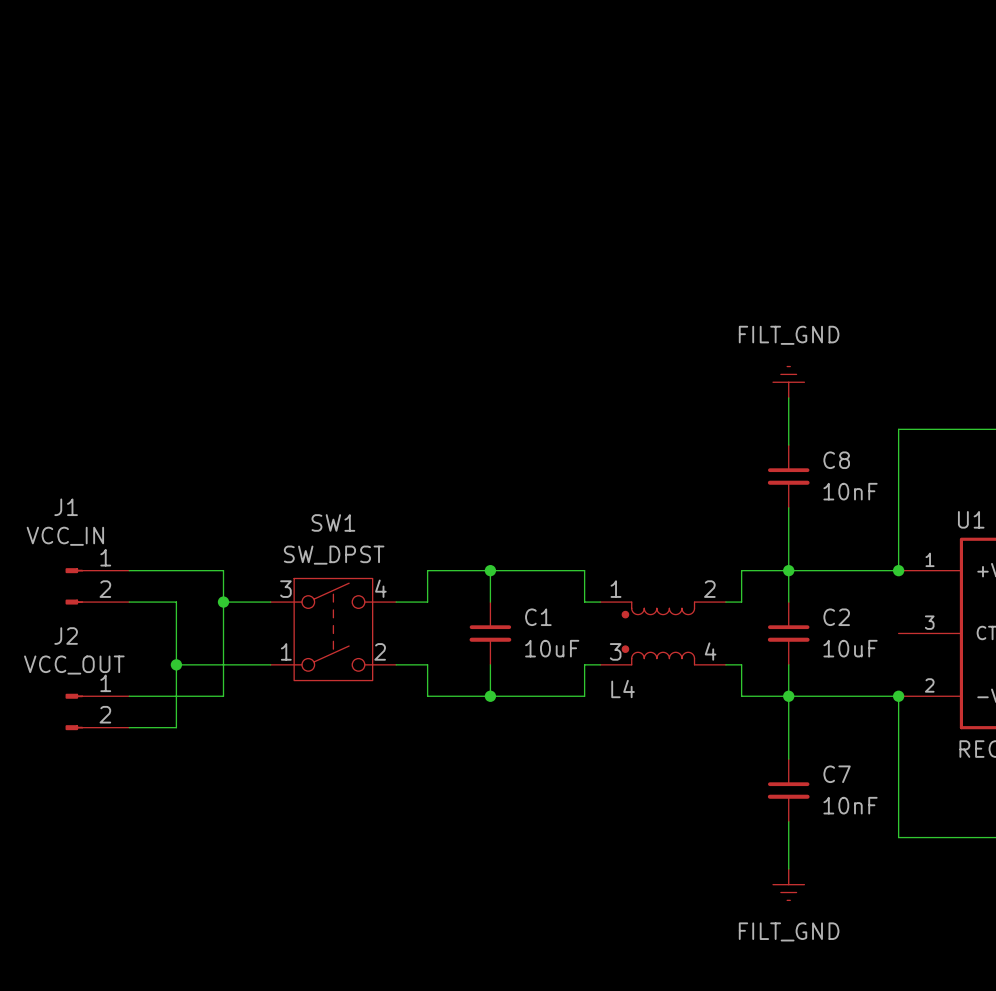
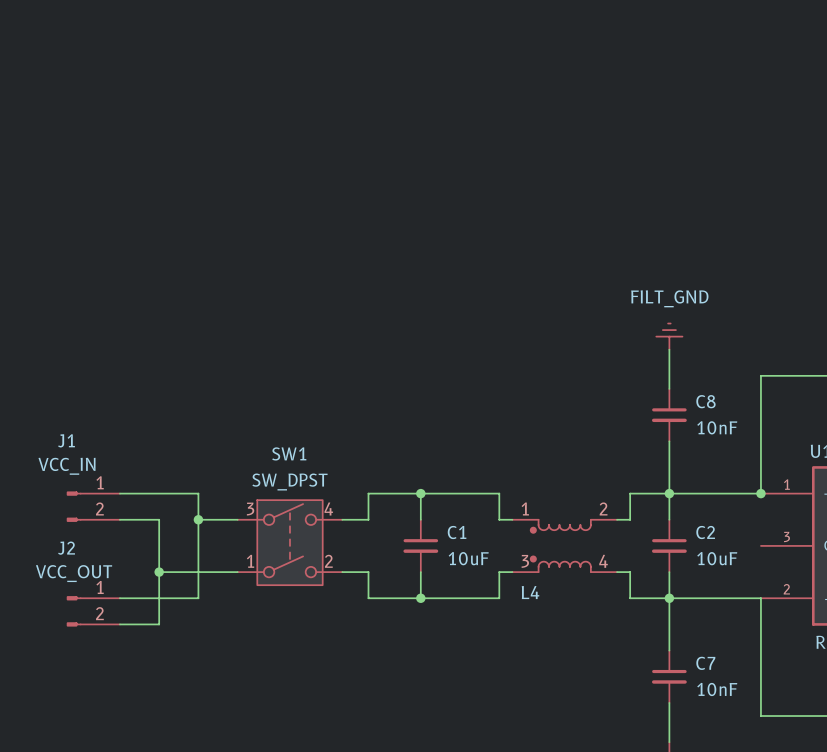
junction: (898, 696) -> none

